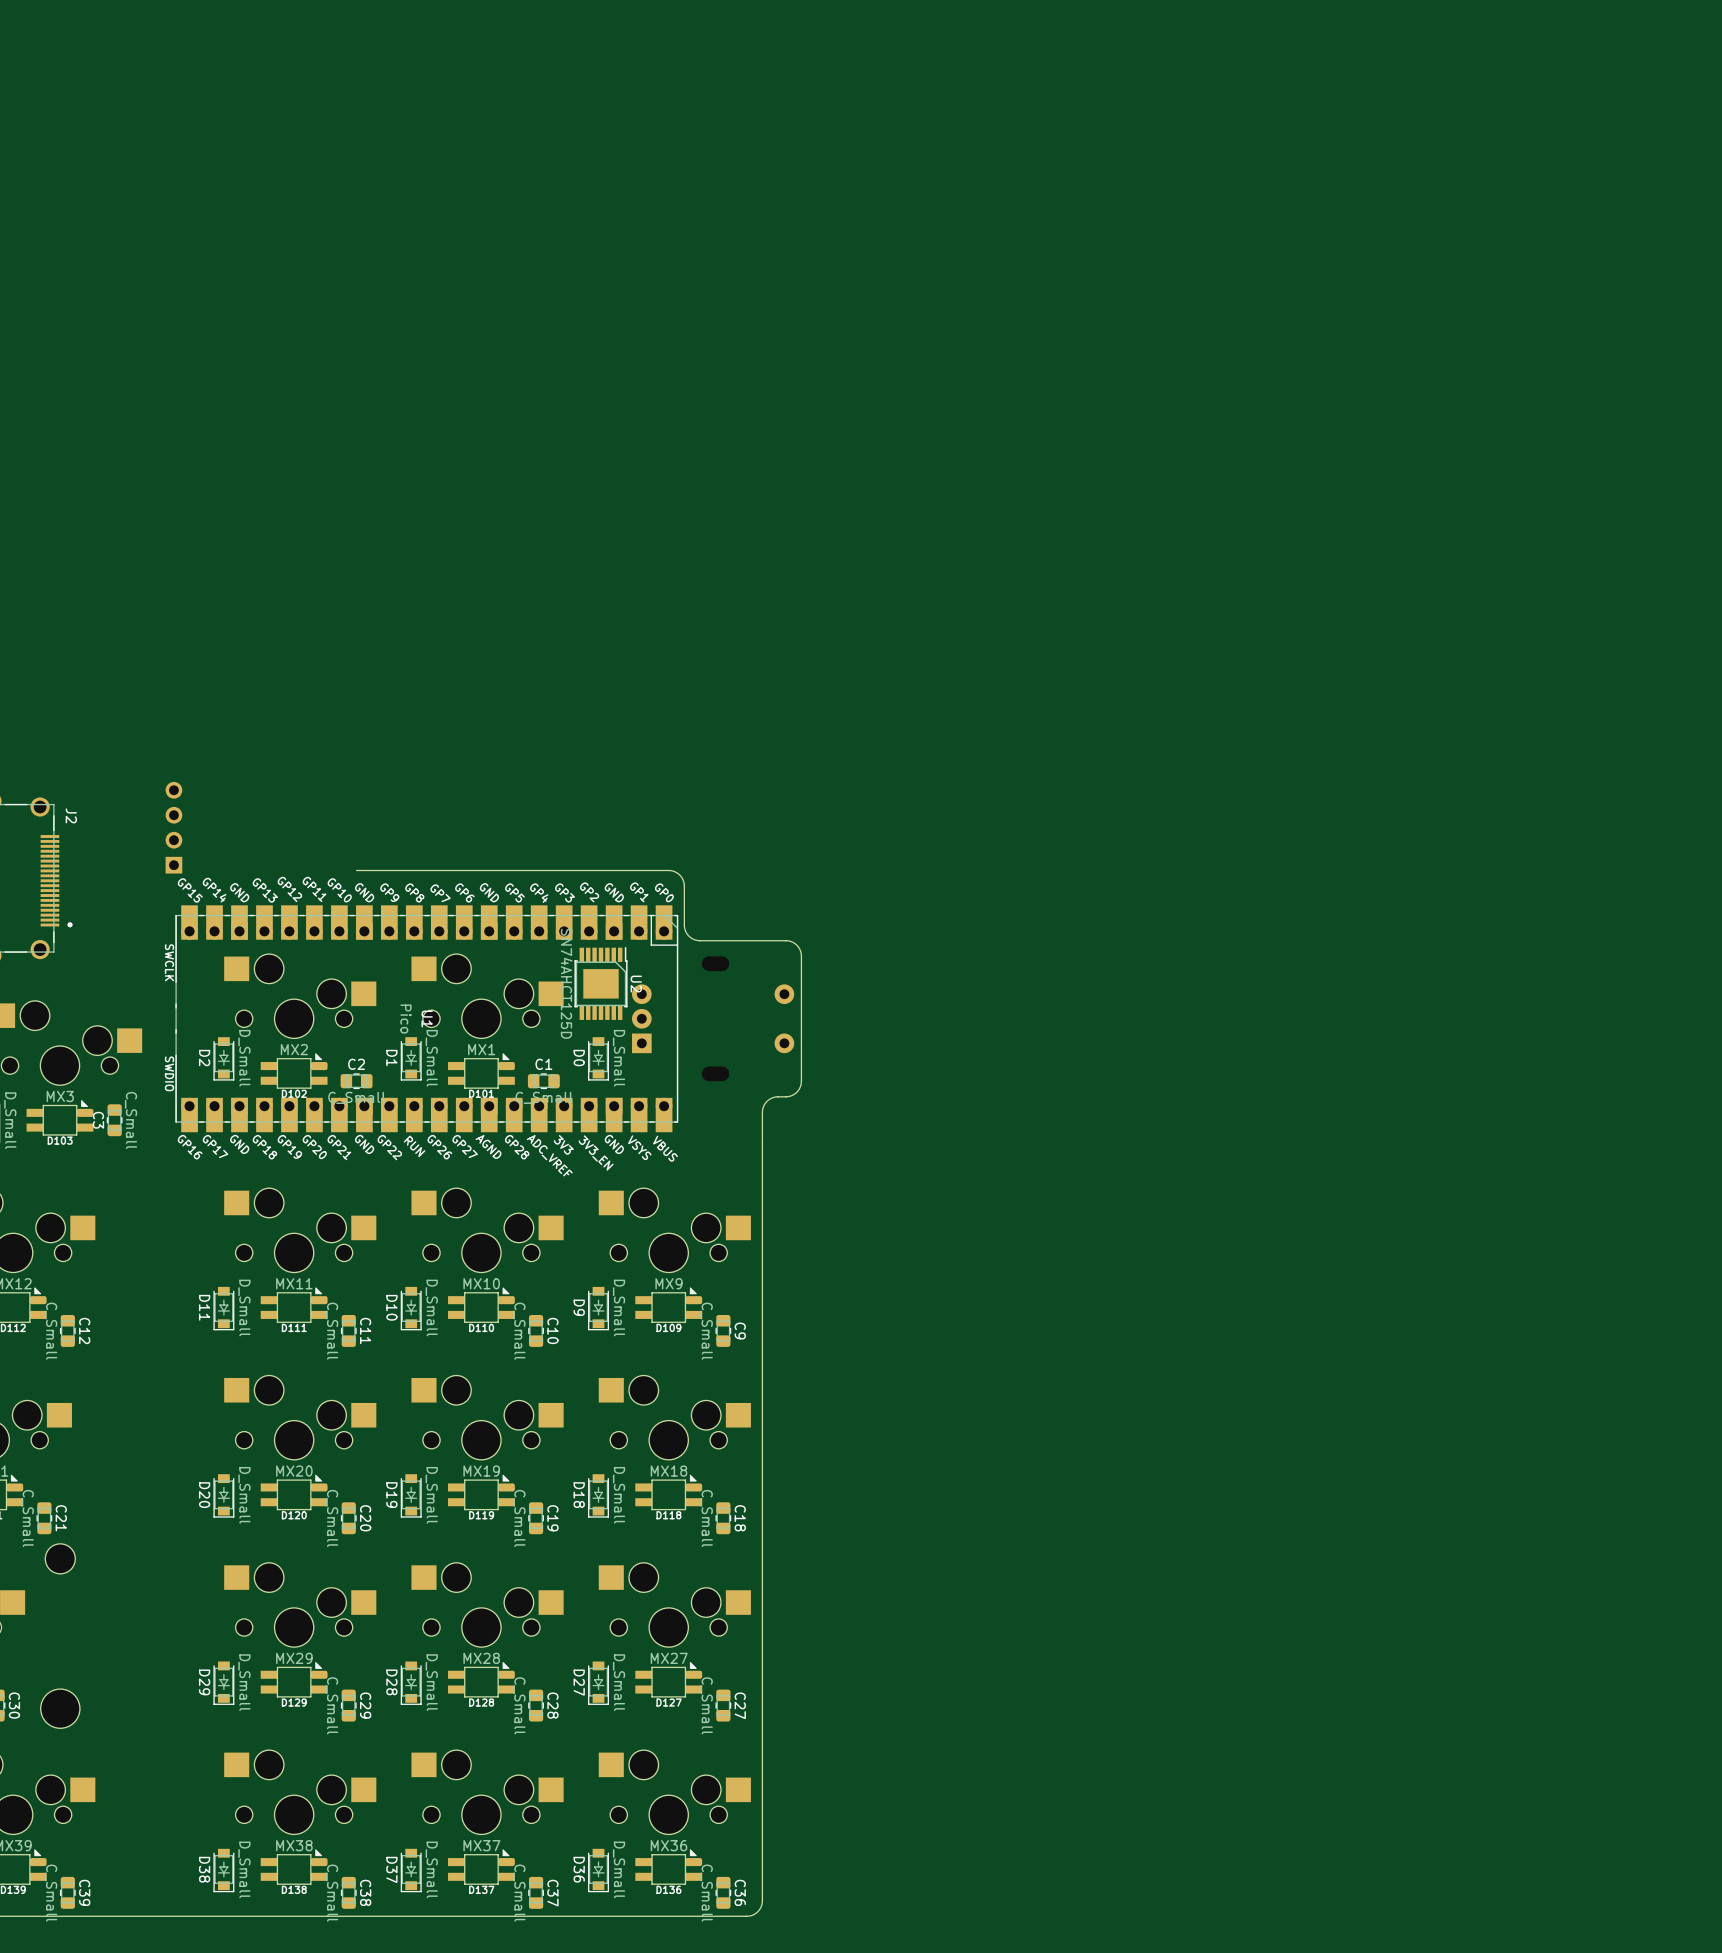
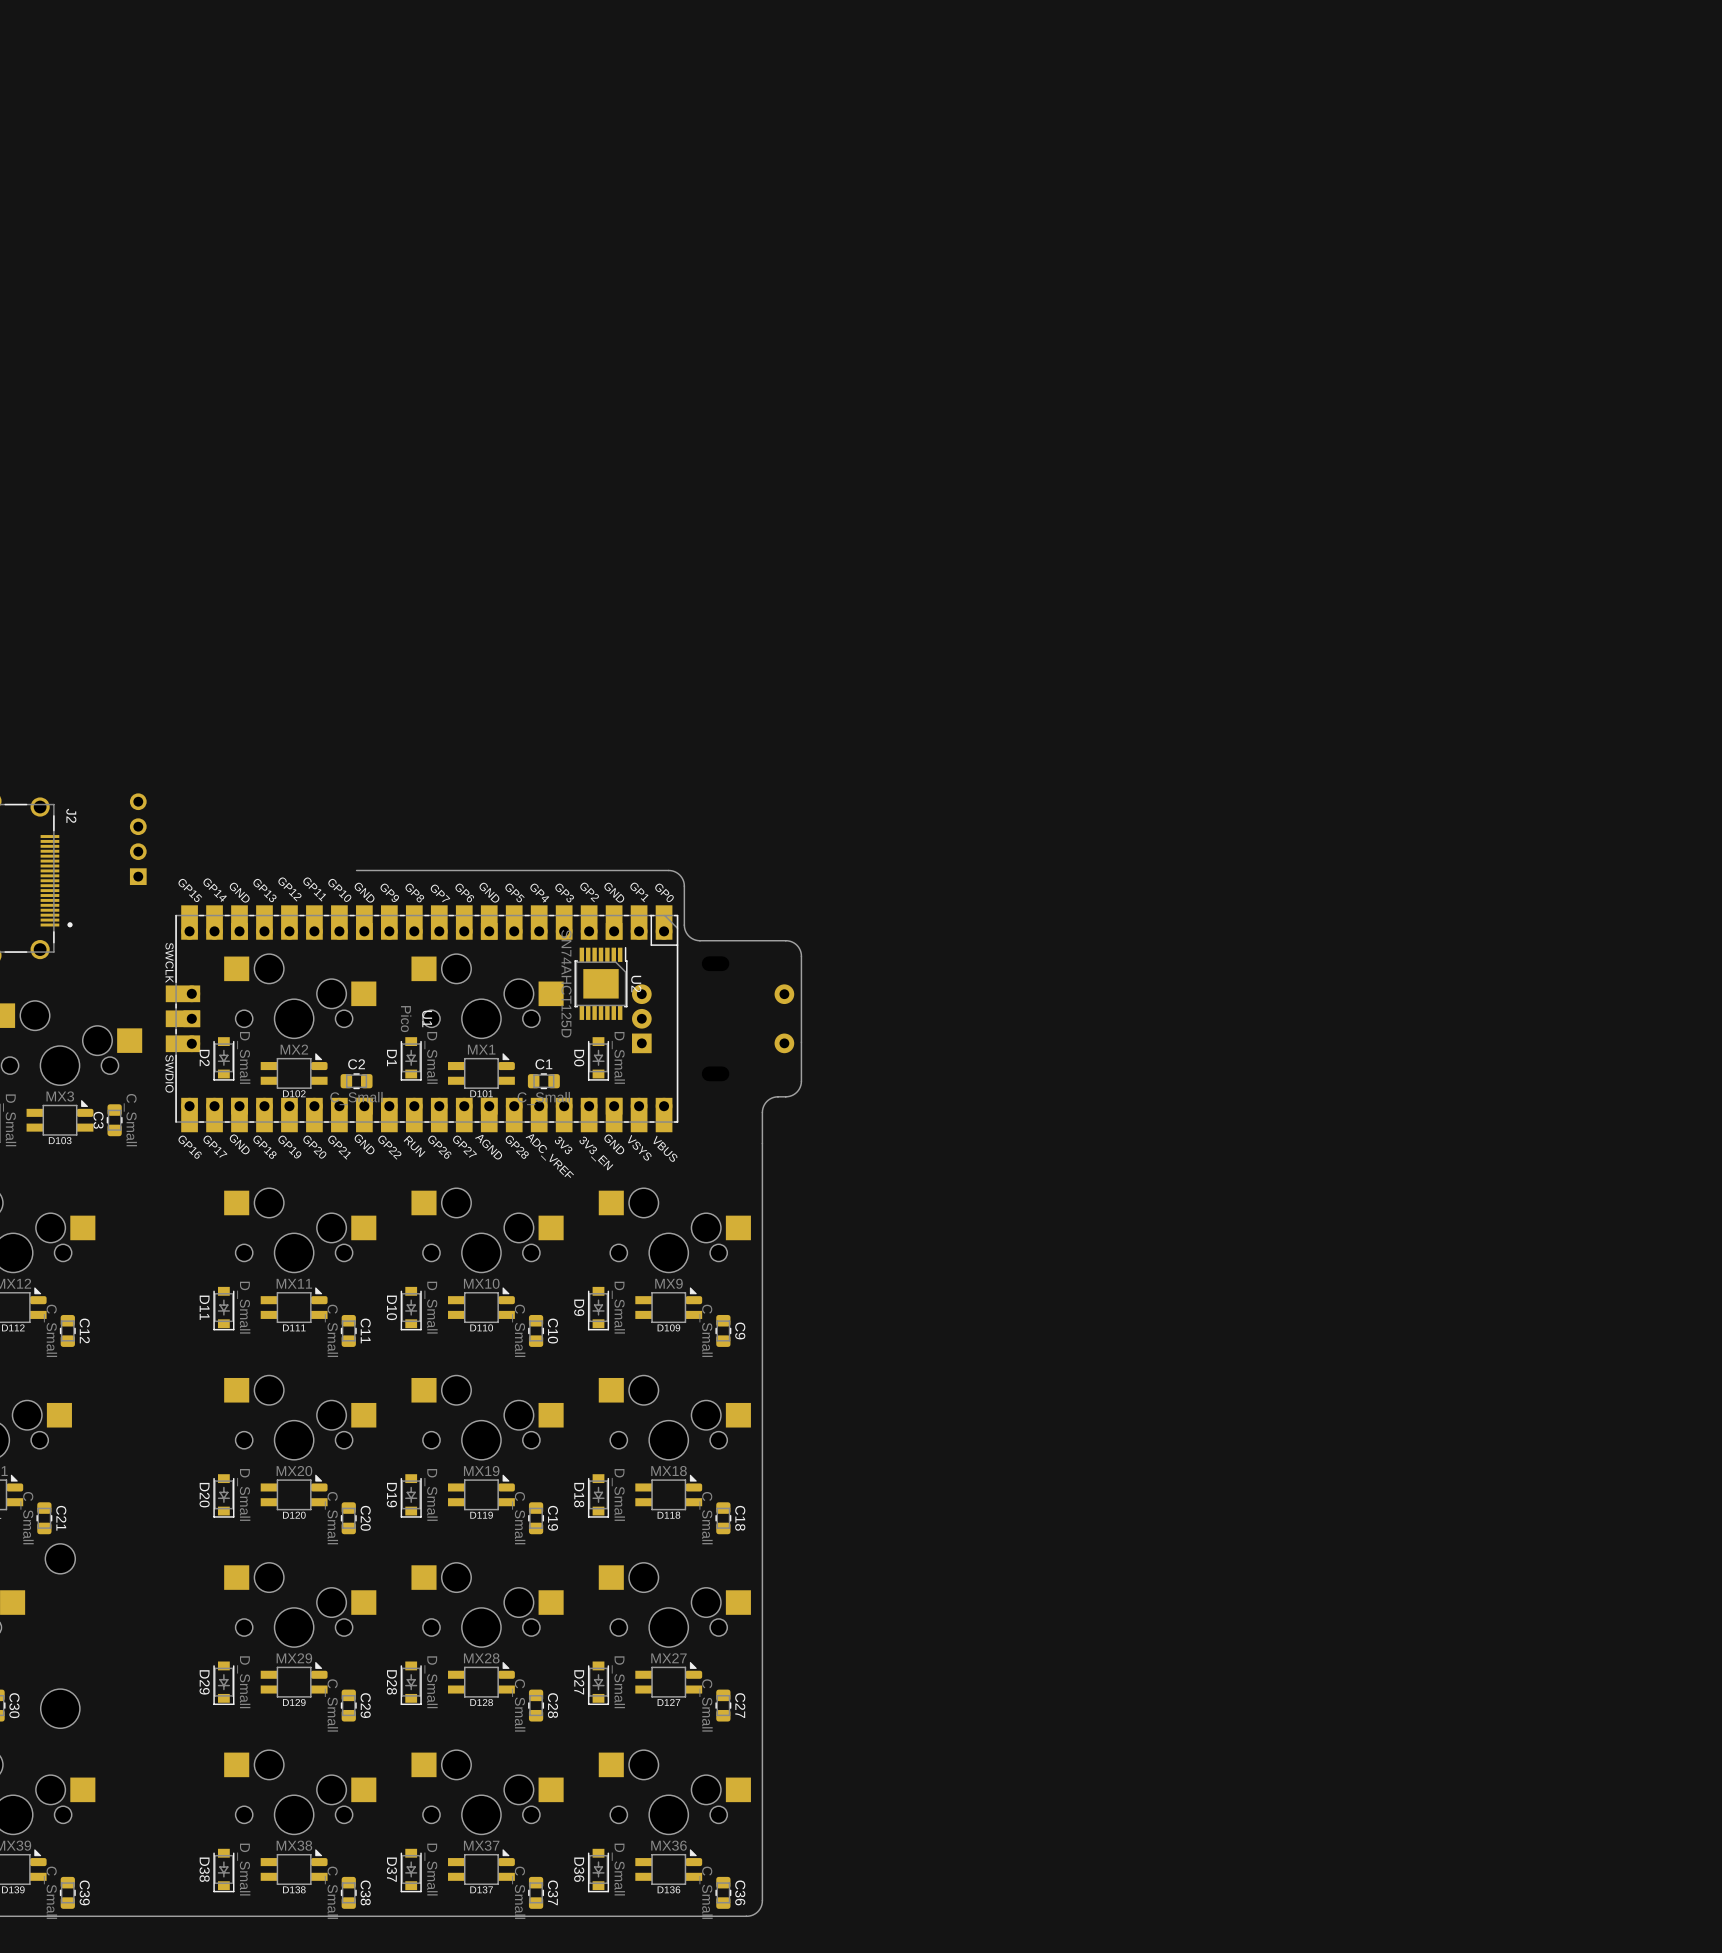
part position: (173, 827) -> (138, 839)
U1 footprint: [175, 905, 679, 1133] -> [165, 905, 679, 1133]

